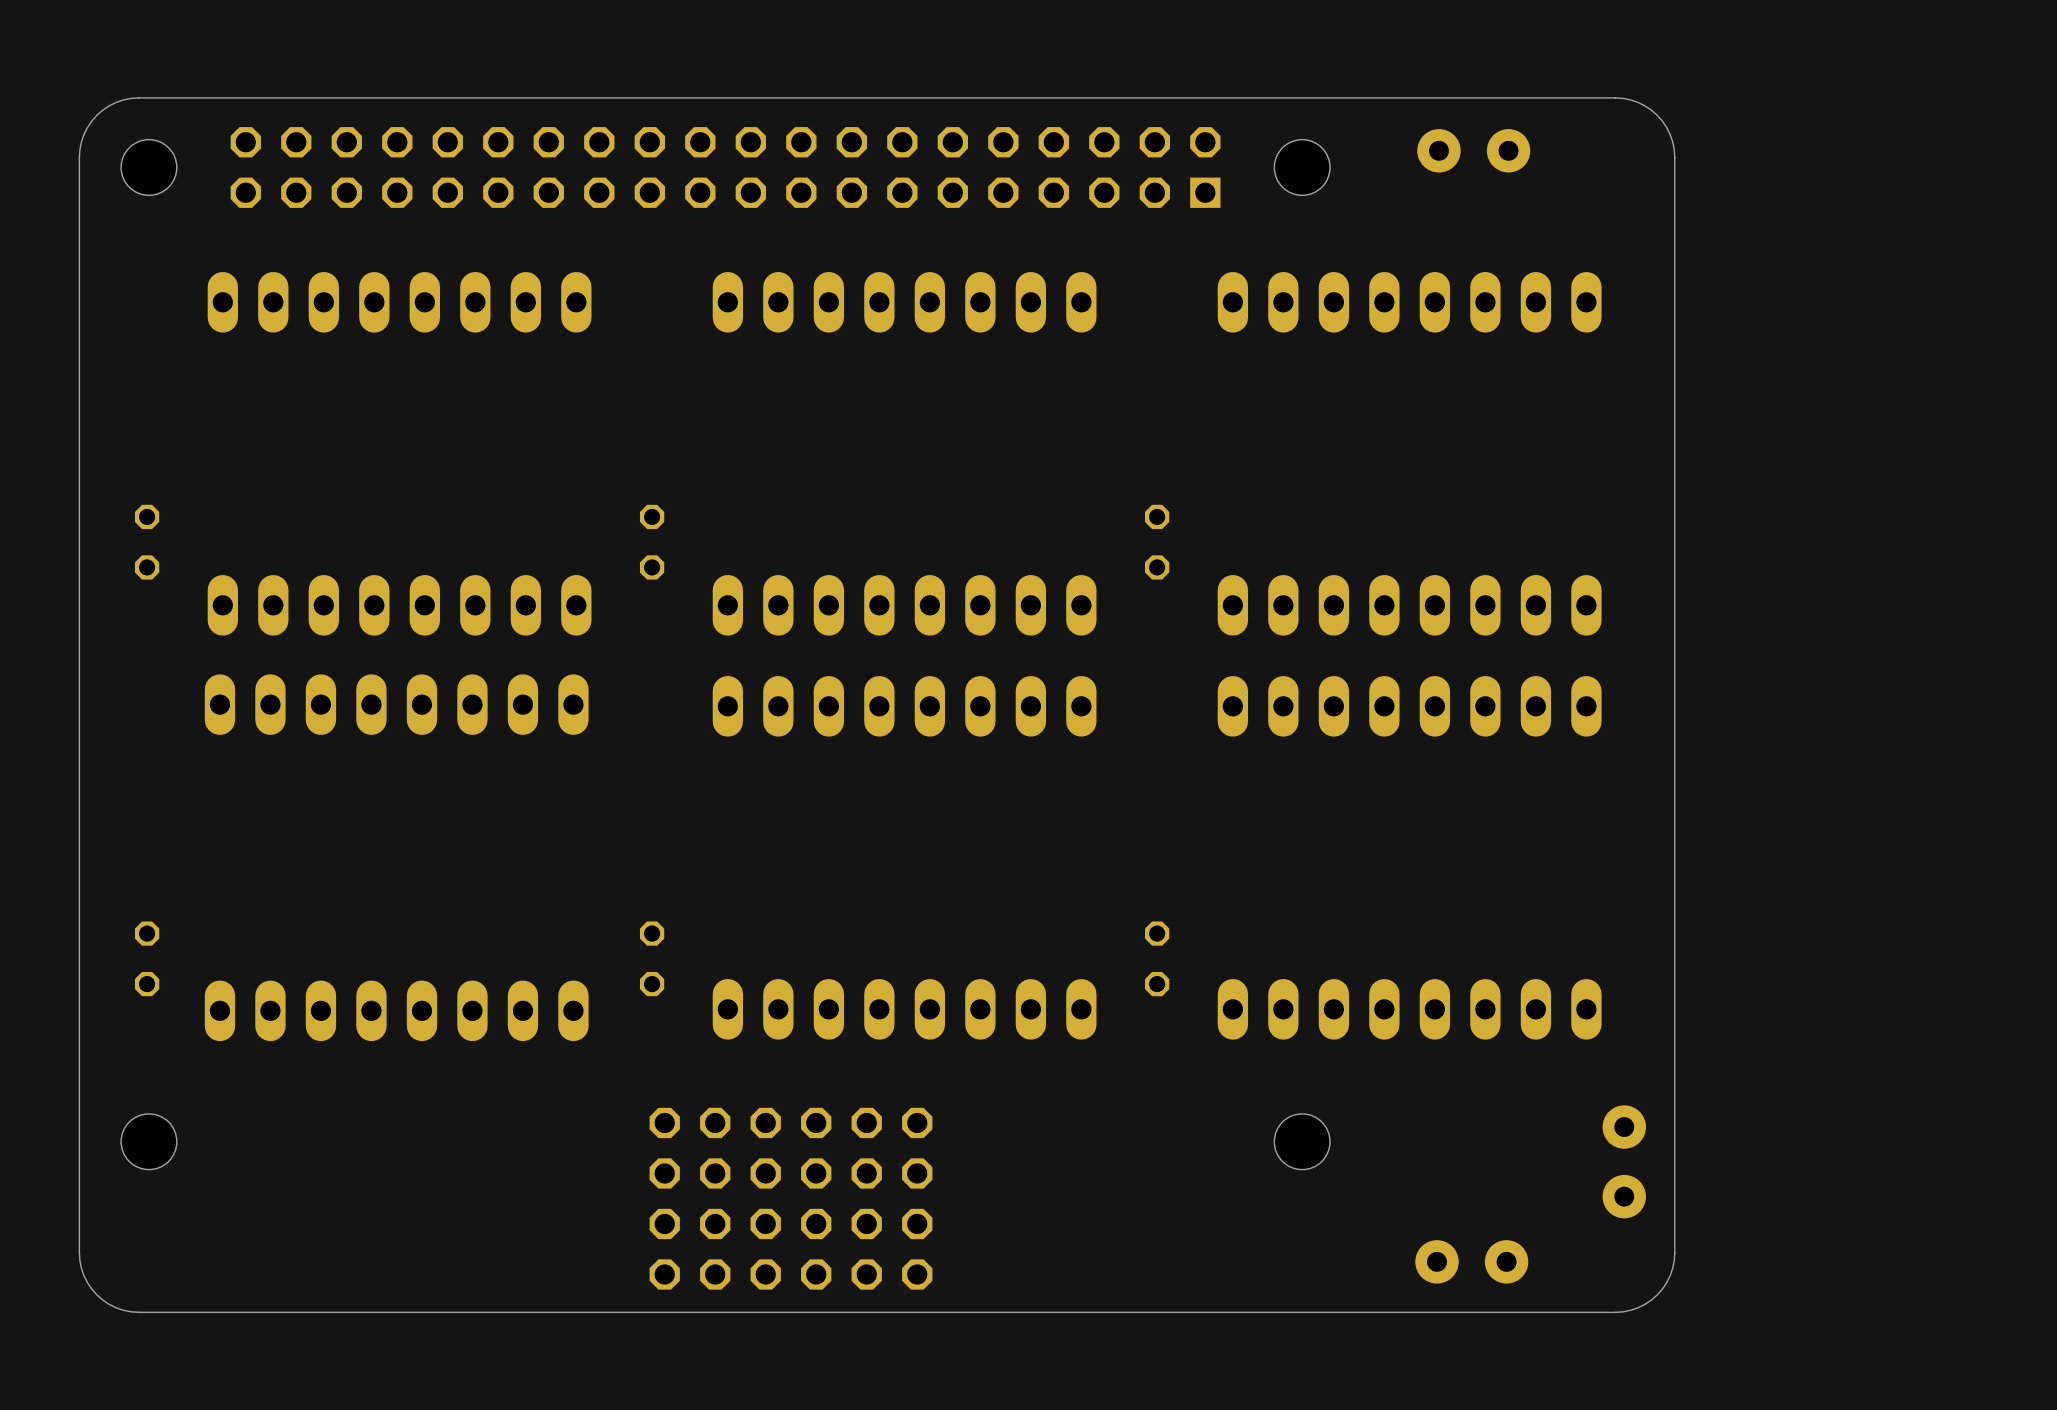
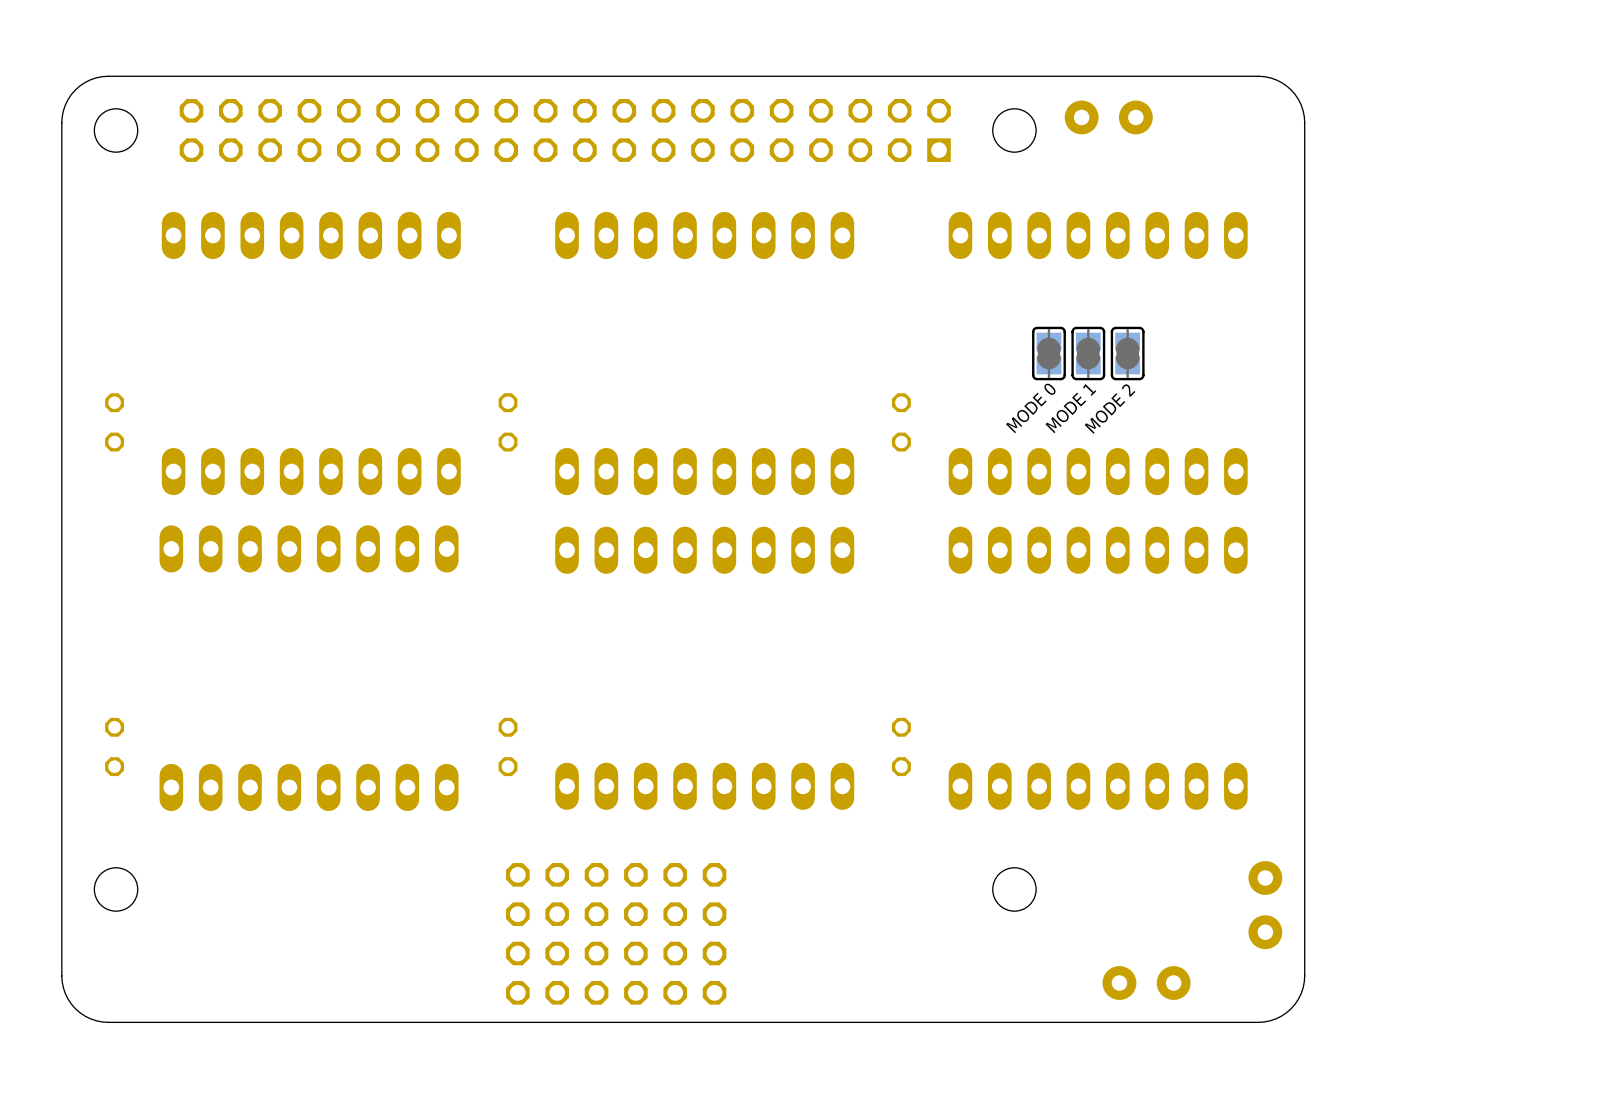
part position: (1473, 150) -> (1108, 117)
part: none -> (1048, 353)
part: none -> (1088, 353)
part: none -> (1127, 353)
text: none -> MODE 1 (1070, 408)
text: none -> MODE 0 (1030, 408)
text: none -> MODE 2 (1110, 409)

